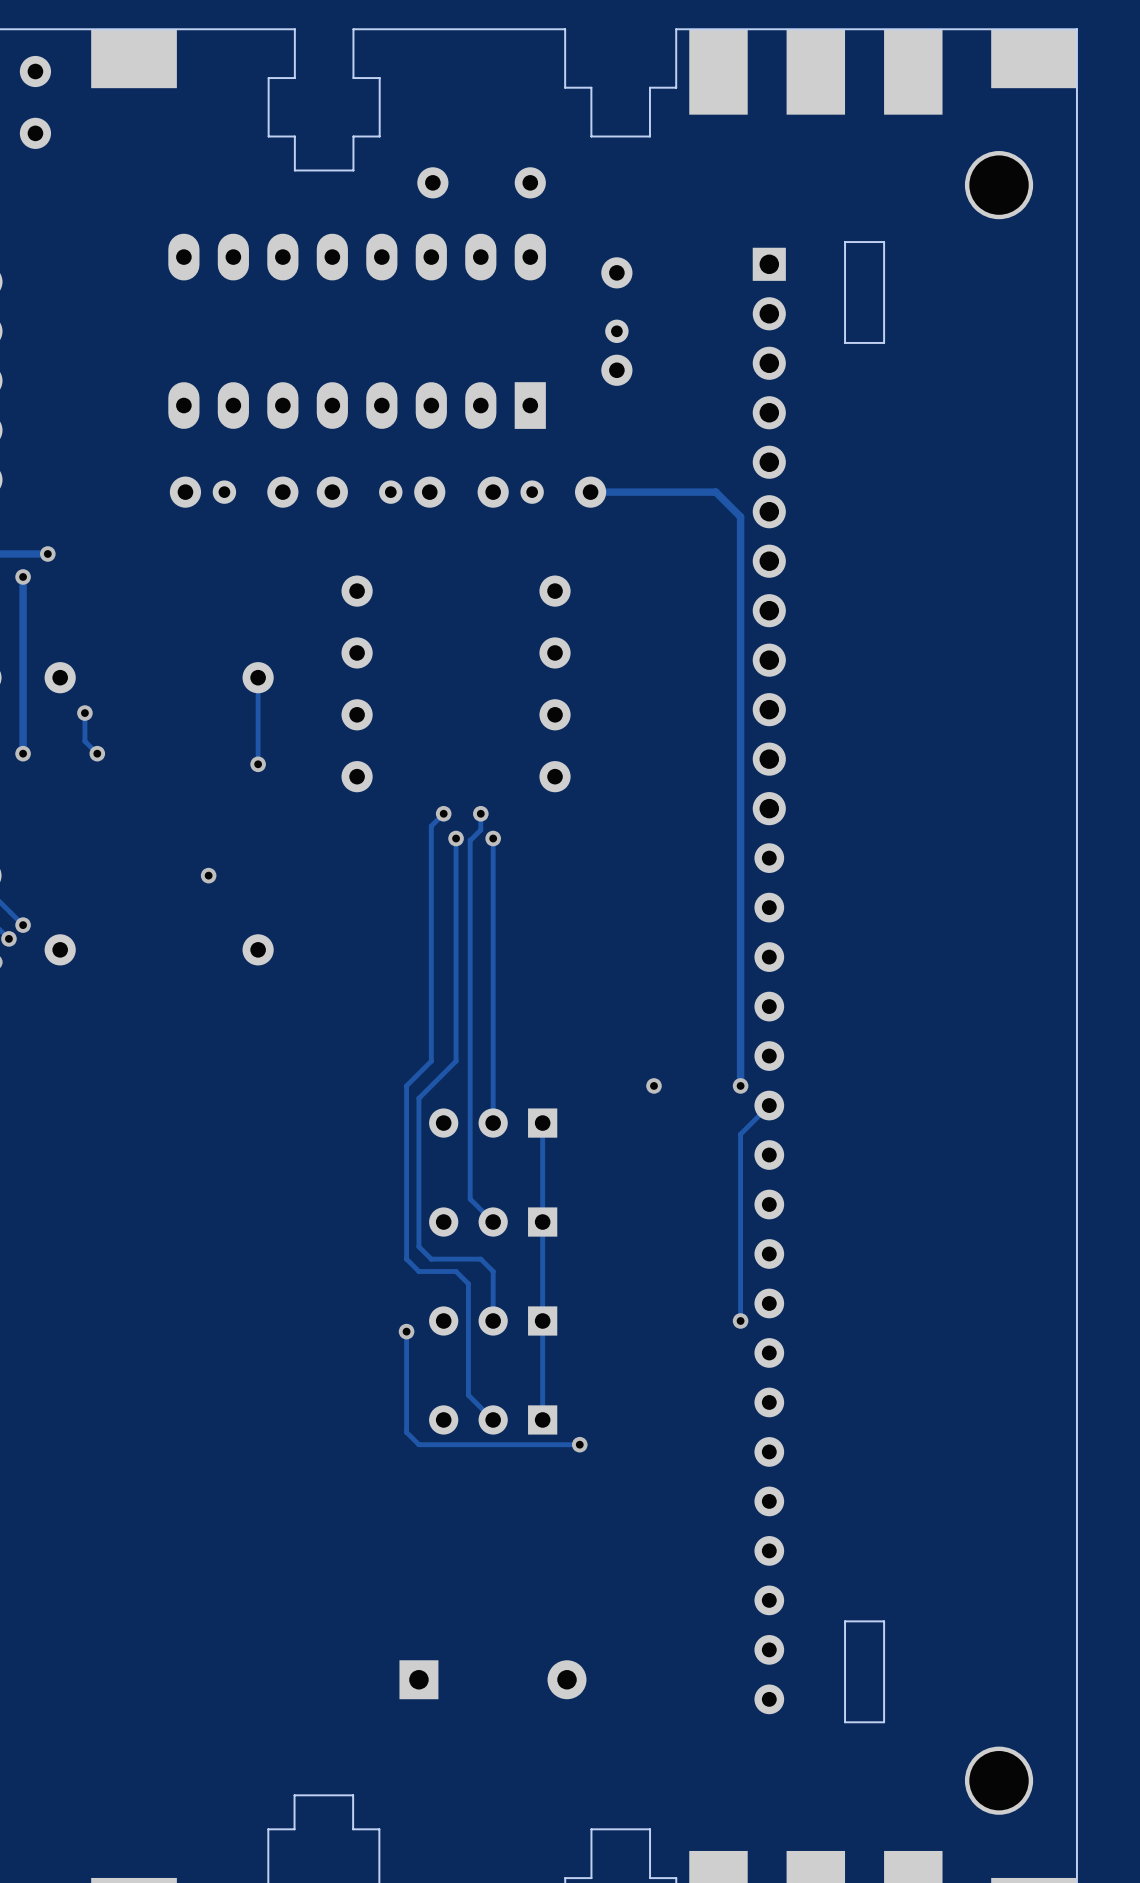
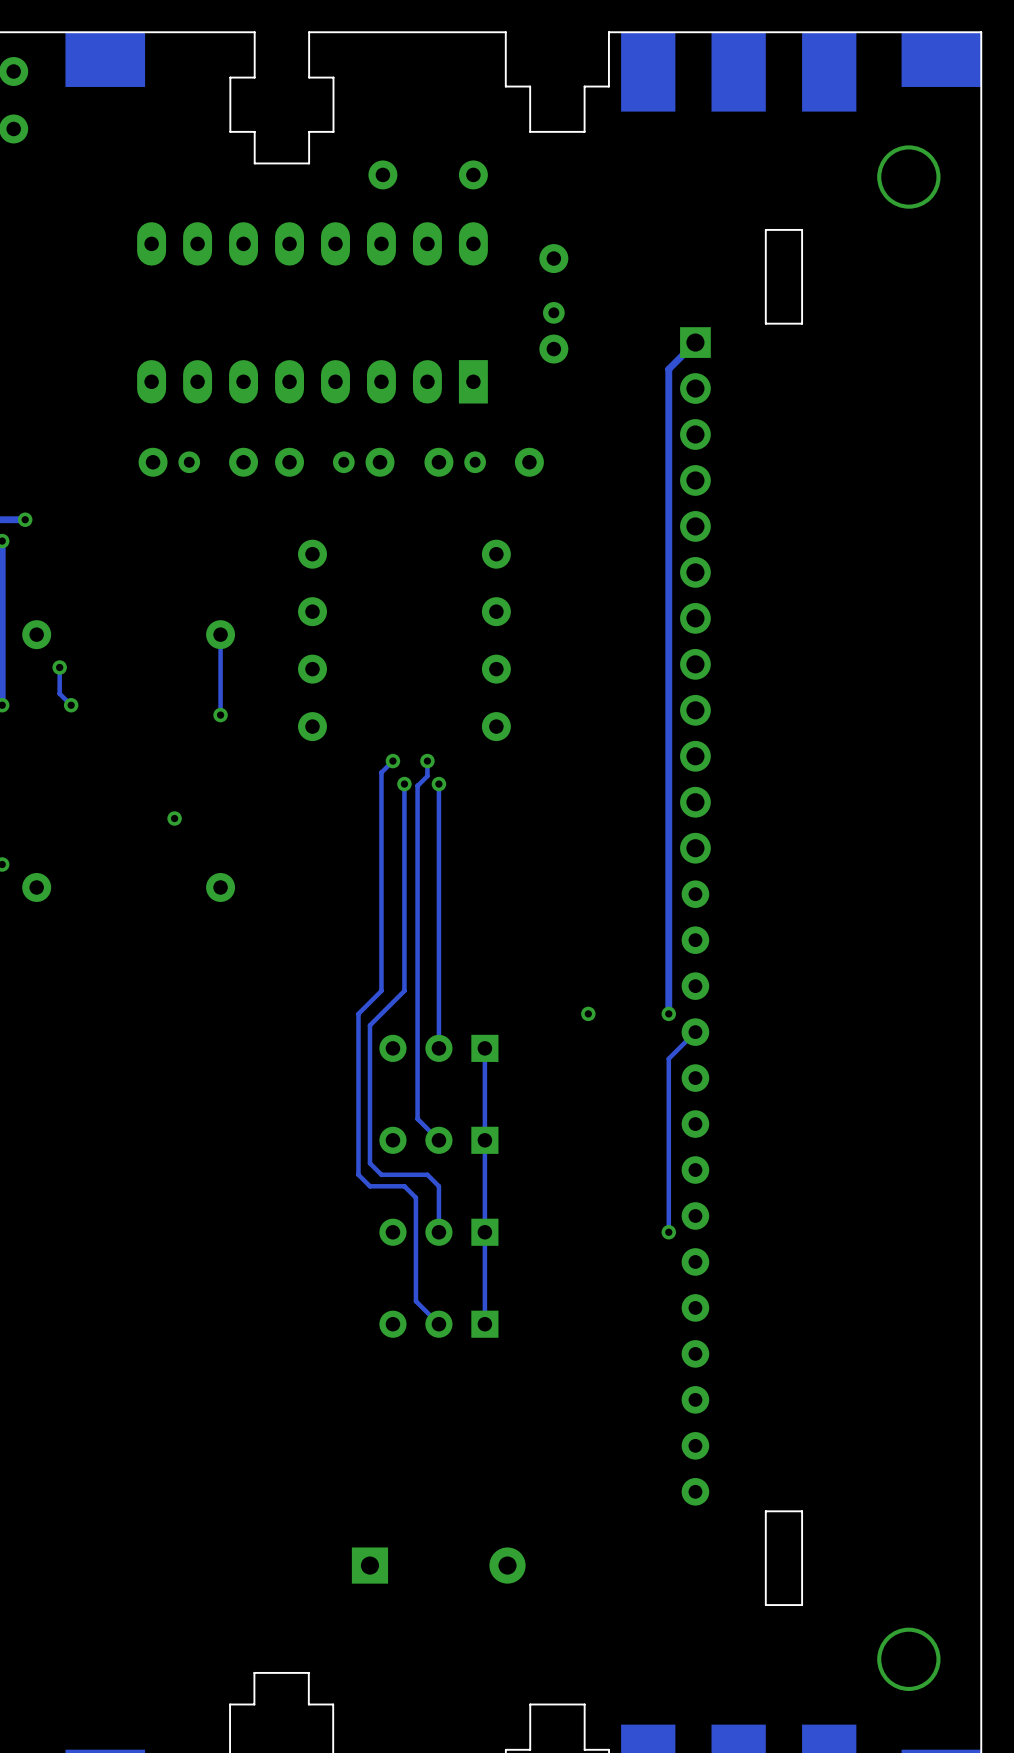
part footprint: [752, 247, 786, 1715] -> [680, 327, 711, 1506]
track: (590, 492) (715, 492) (740, 516) -> (695, 342) (668, 369) (668, 485)
track: (406, 1331) (406, 1432) (418, 1444) (579, 1444) -> none
via: (406, 1331) -> none
via: (579, 1444) -> none

